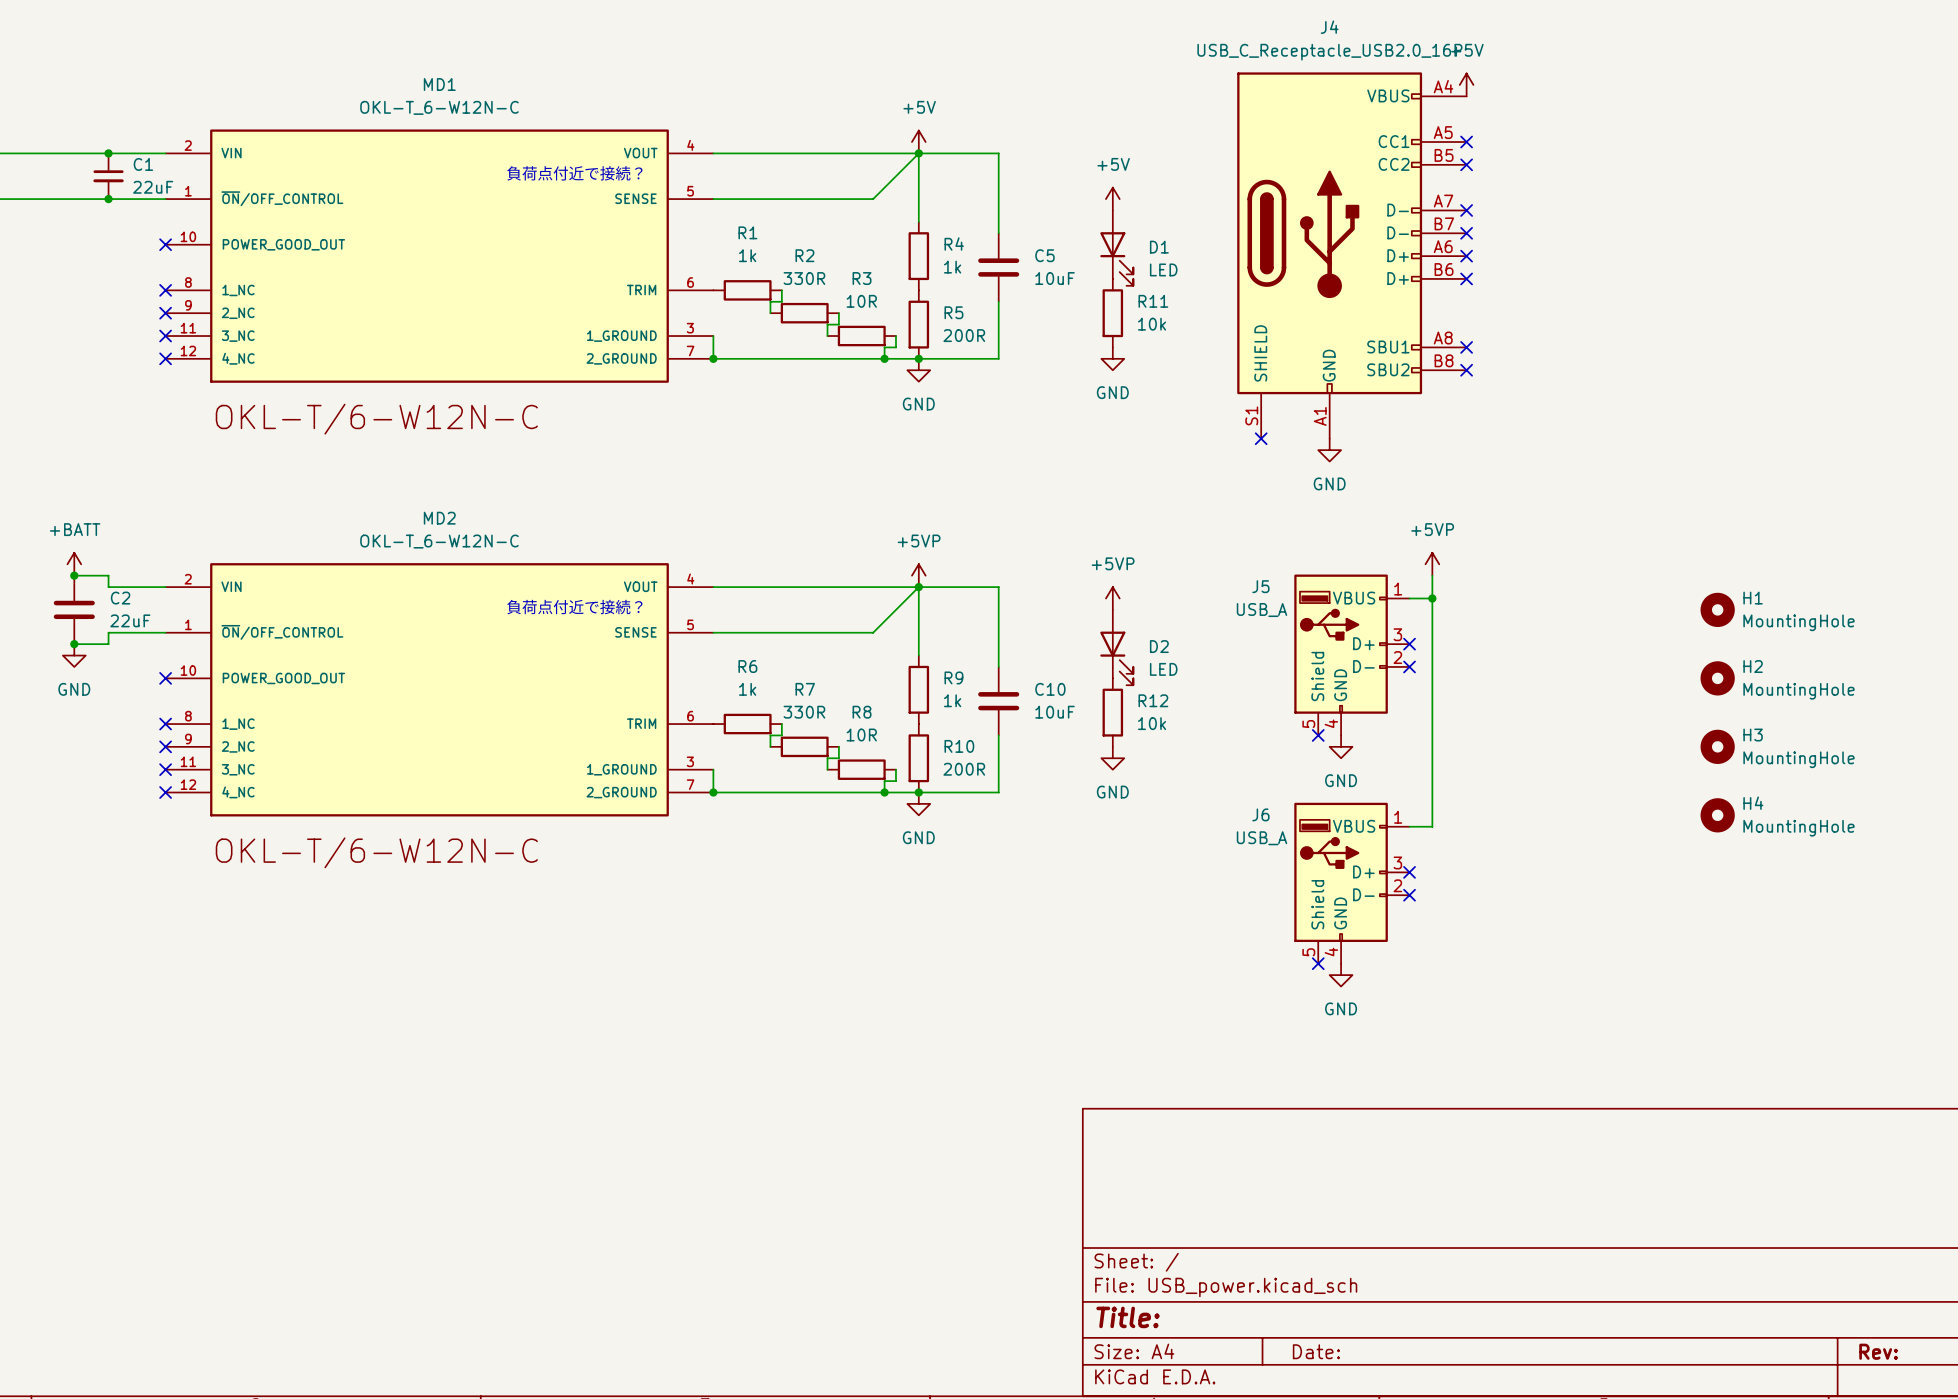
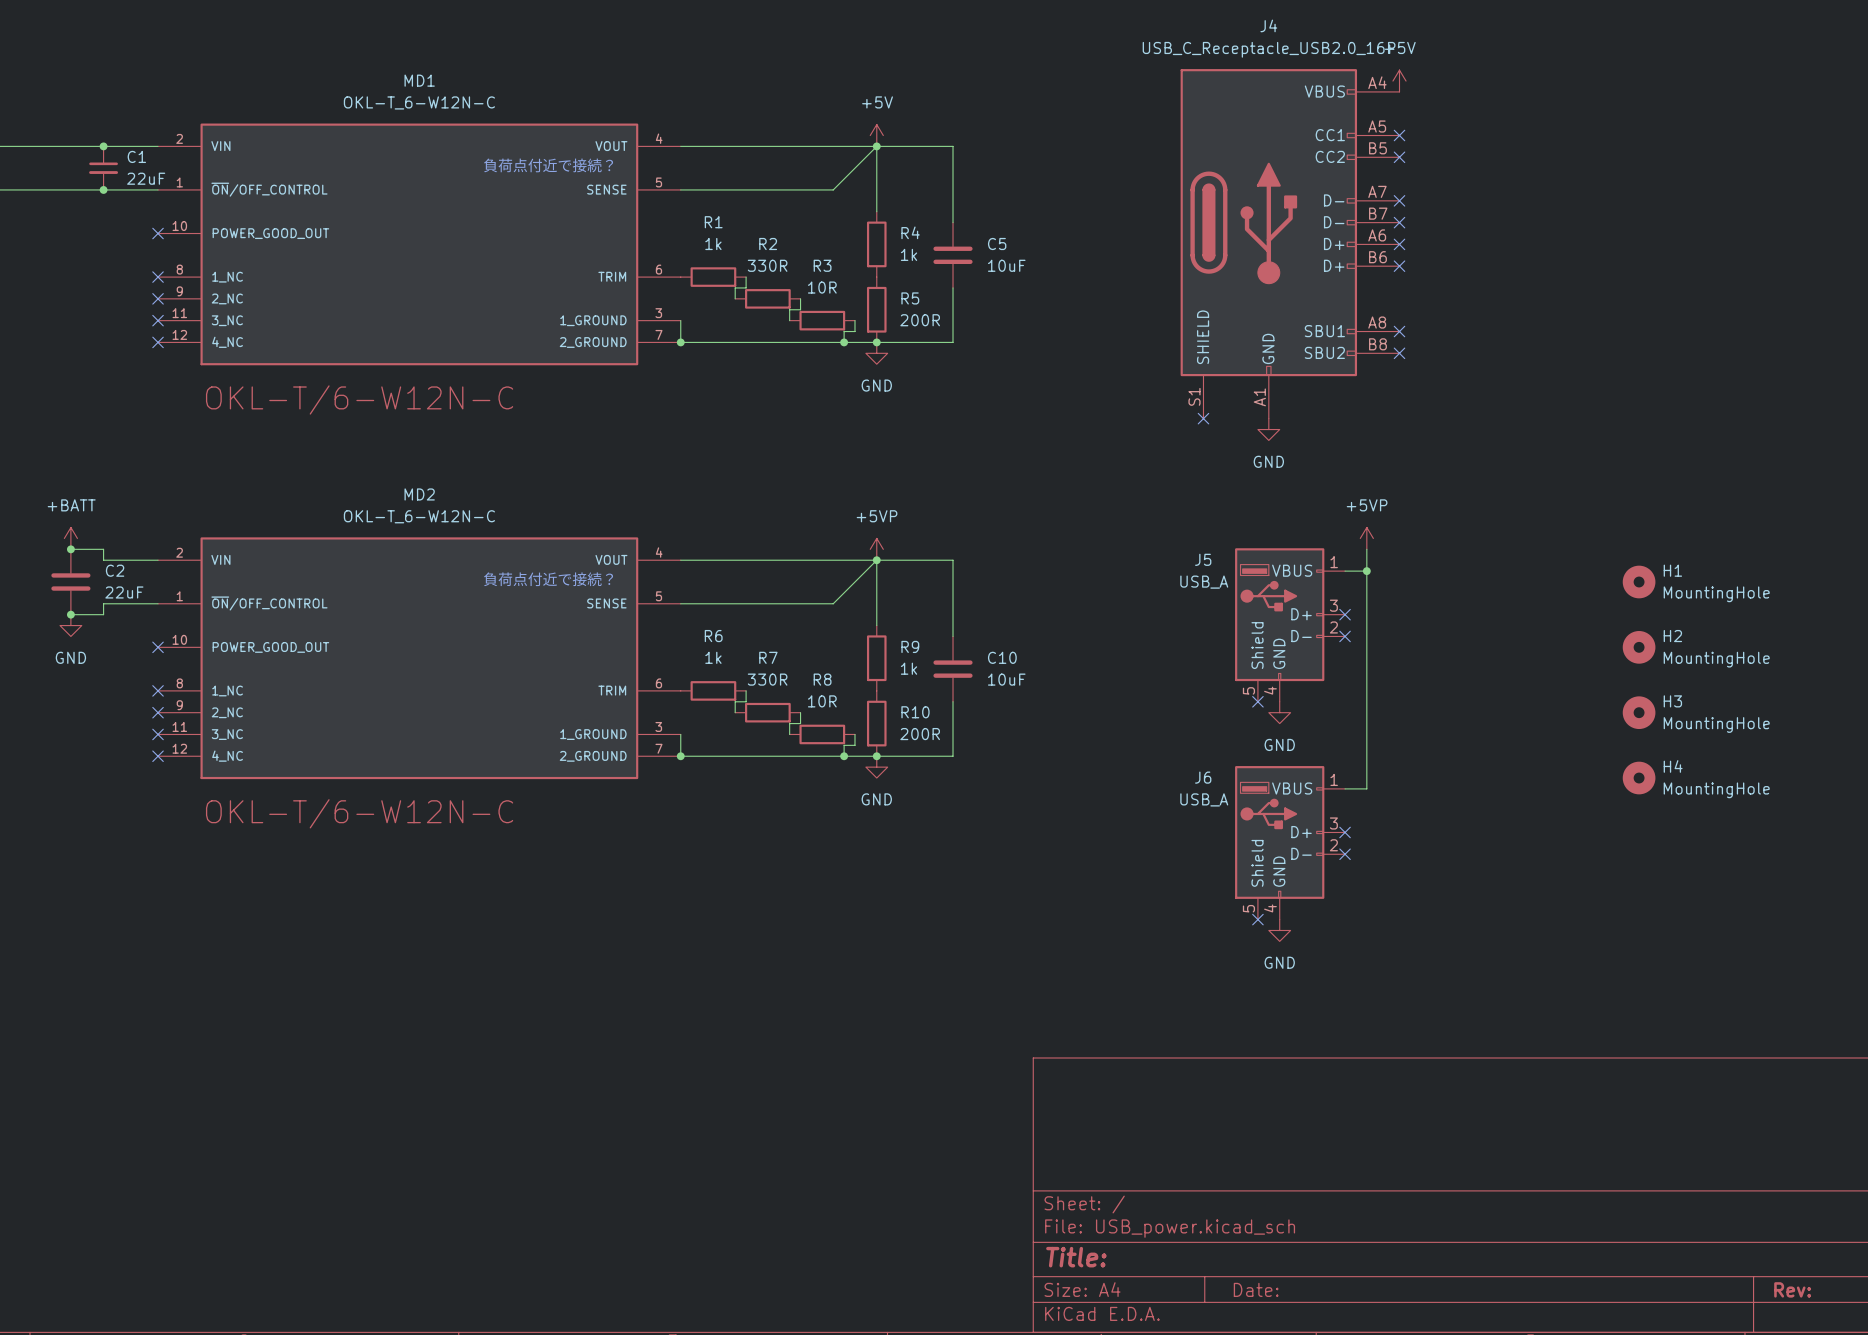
power symbol: +5V (1112, 199) -> none
D1: LED (1116, 248) -> none
R11: 10k (1112, 313) -> none
power symbol: GND (1112, 358) -> none
power symbol: +5VP (1112, 598) -> none
D2: LED (1116, 647) -> none
R12: 10k (1112, 712) -> none
power symbol: GND (1112, 758) -> none

